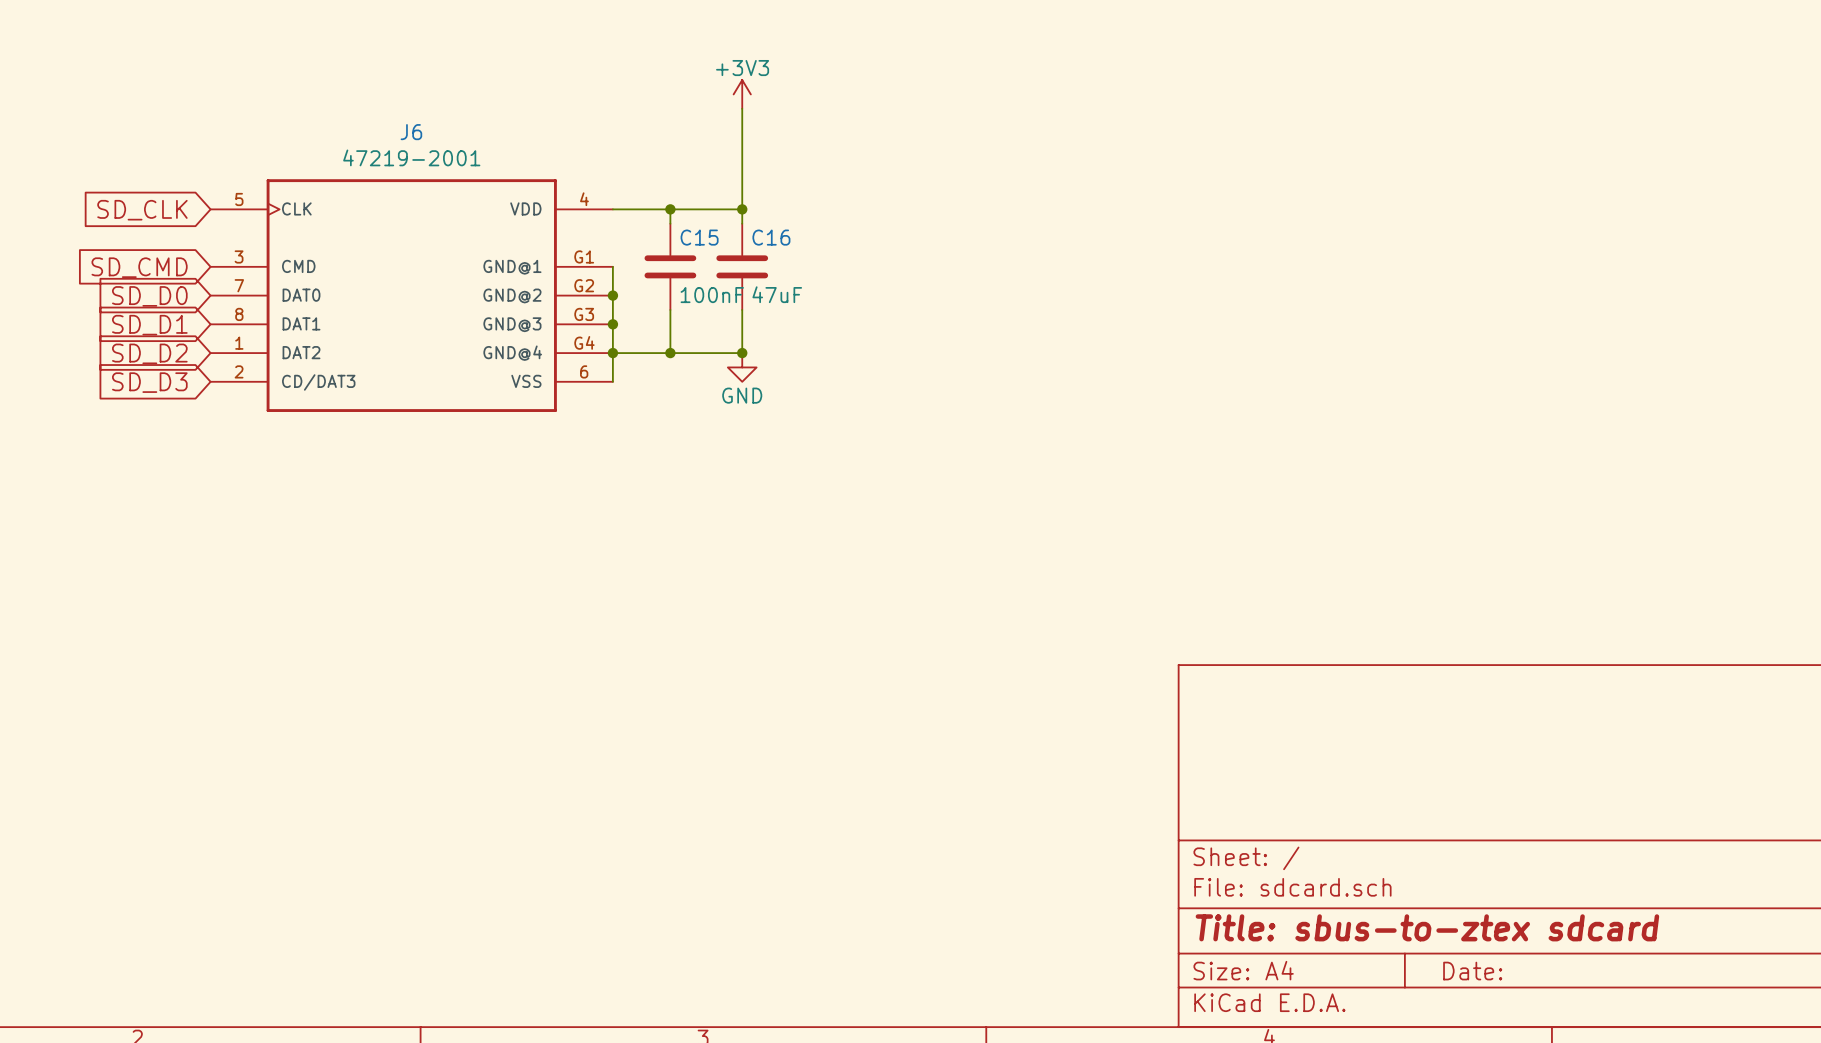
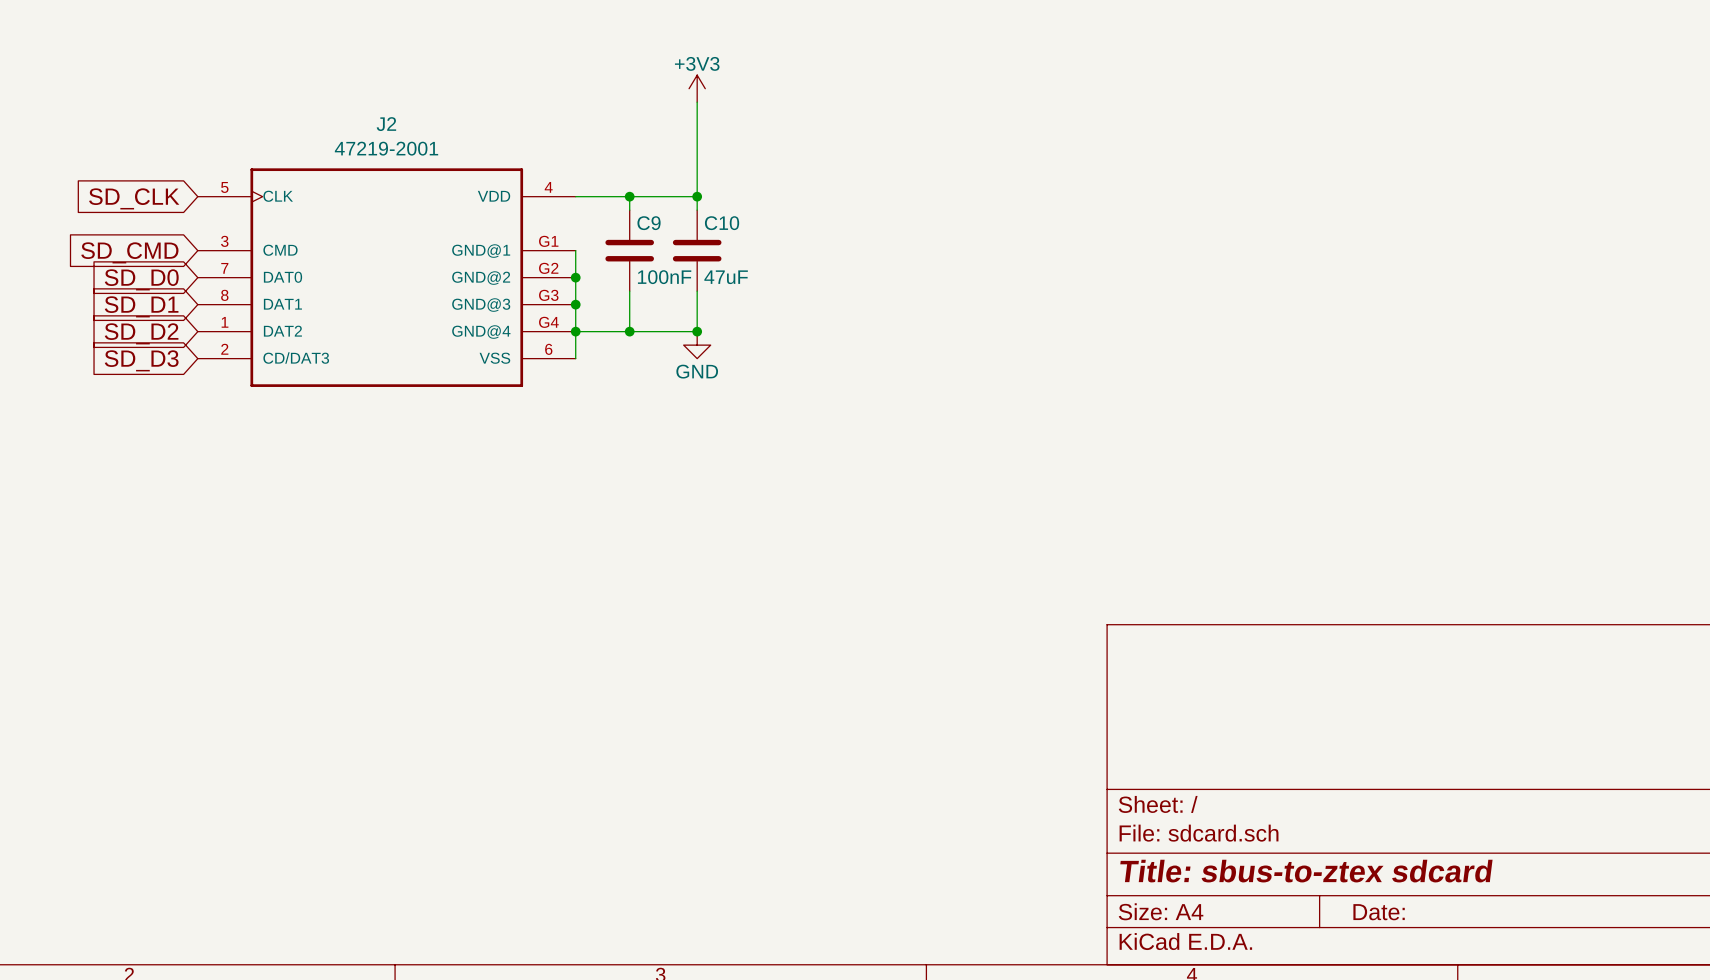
J6 name: J6 (411, 132) -> J2 (386, 124)
C15 name: C15 (699, 237) -> C9 (649, 223)
C16 name: C16 (771, 237) -> C10 (722, 223)

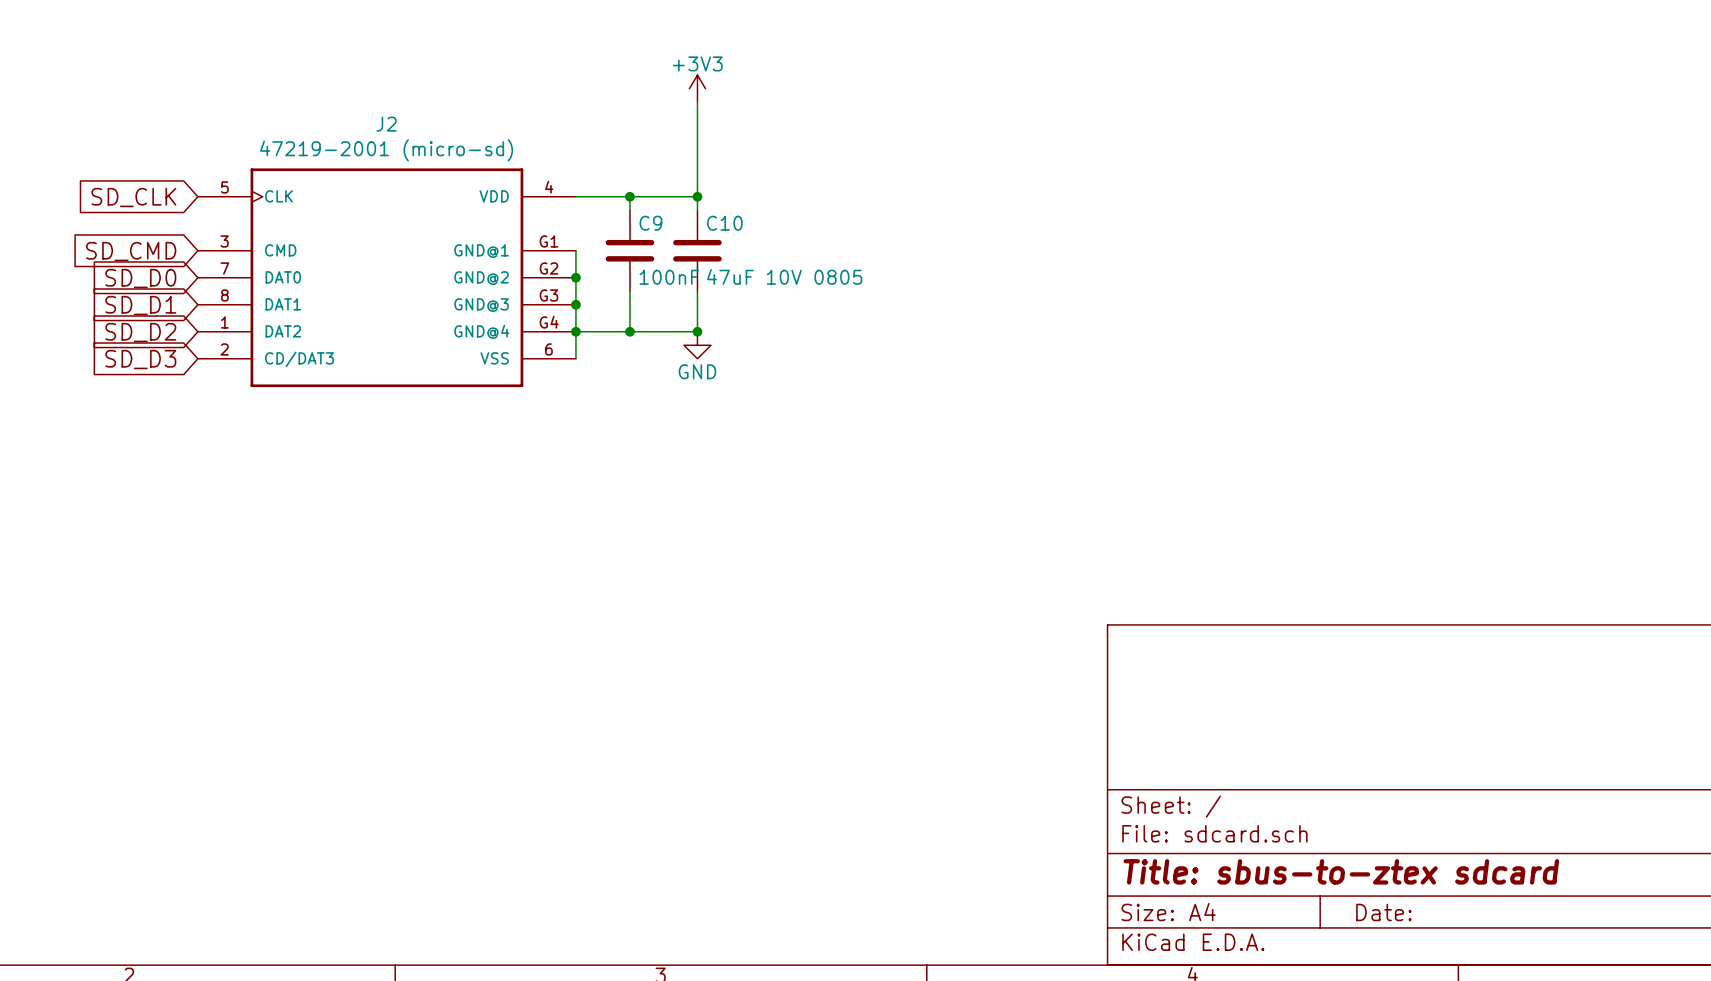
J2 value: 47219-2001 (386, 148) -> 47219-2001 (micro-sd) (386, 150)
C10 value: 47uF (726, 277) -> 47uF 10V 0805 (784, 276)

